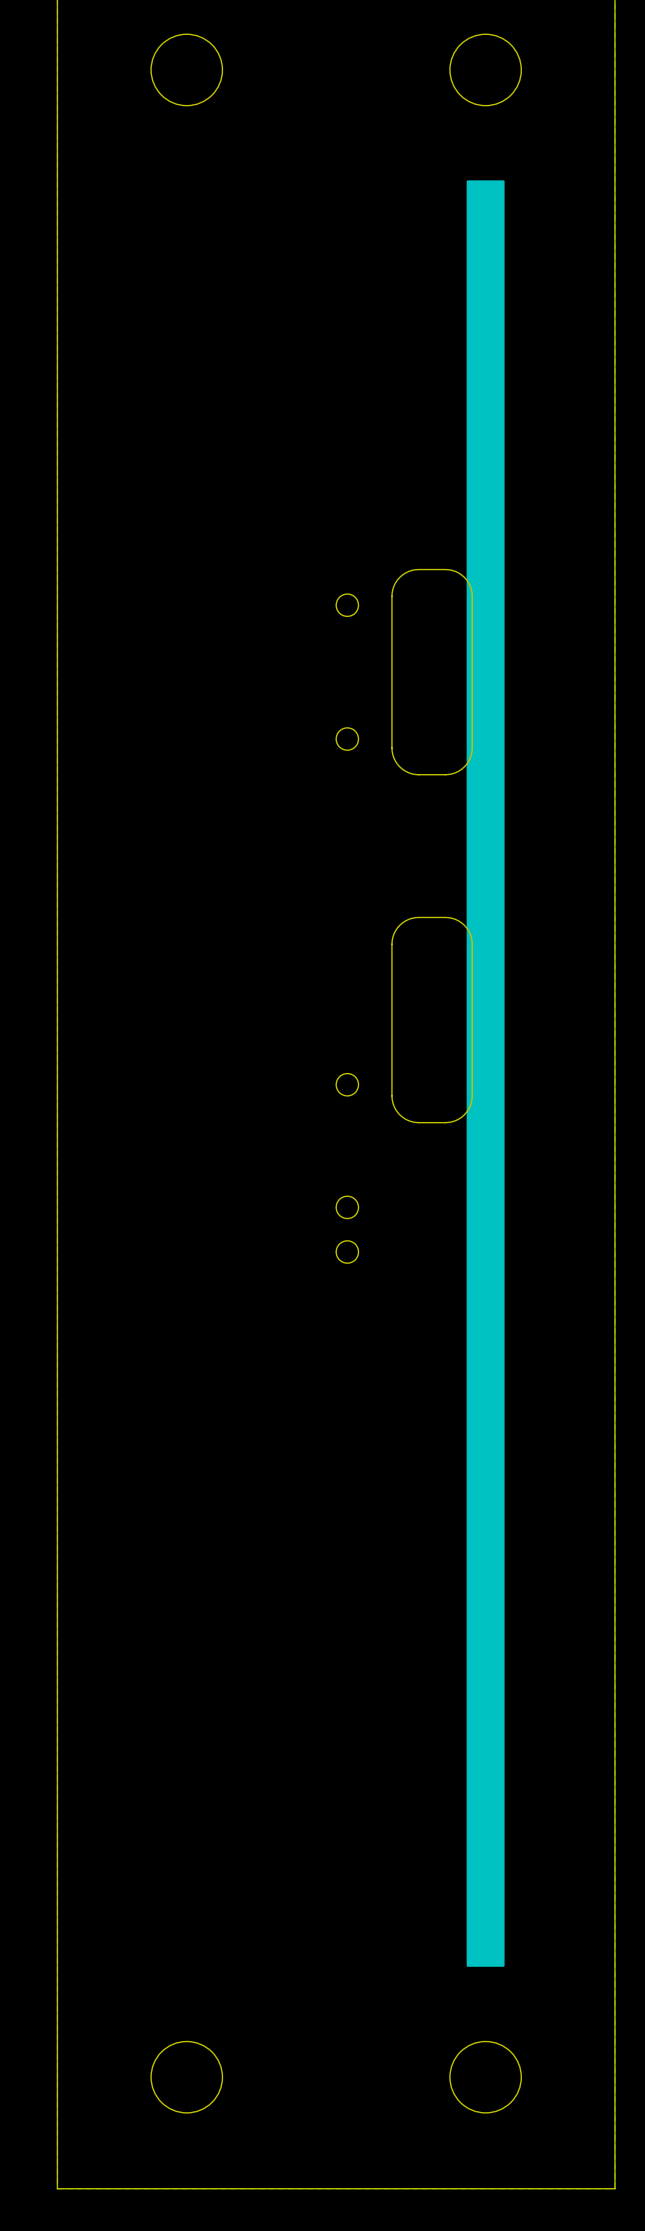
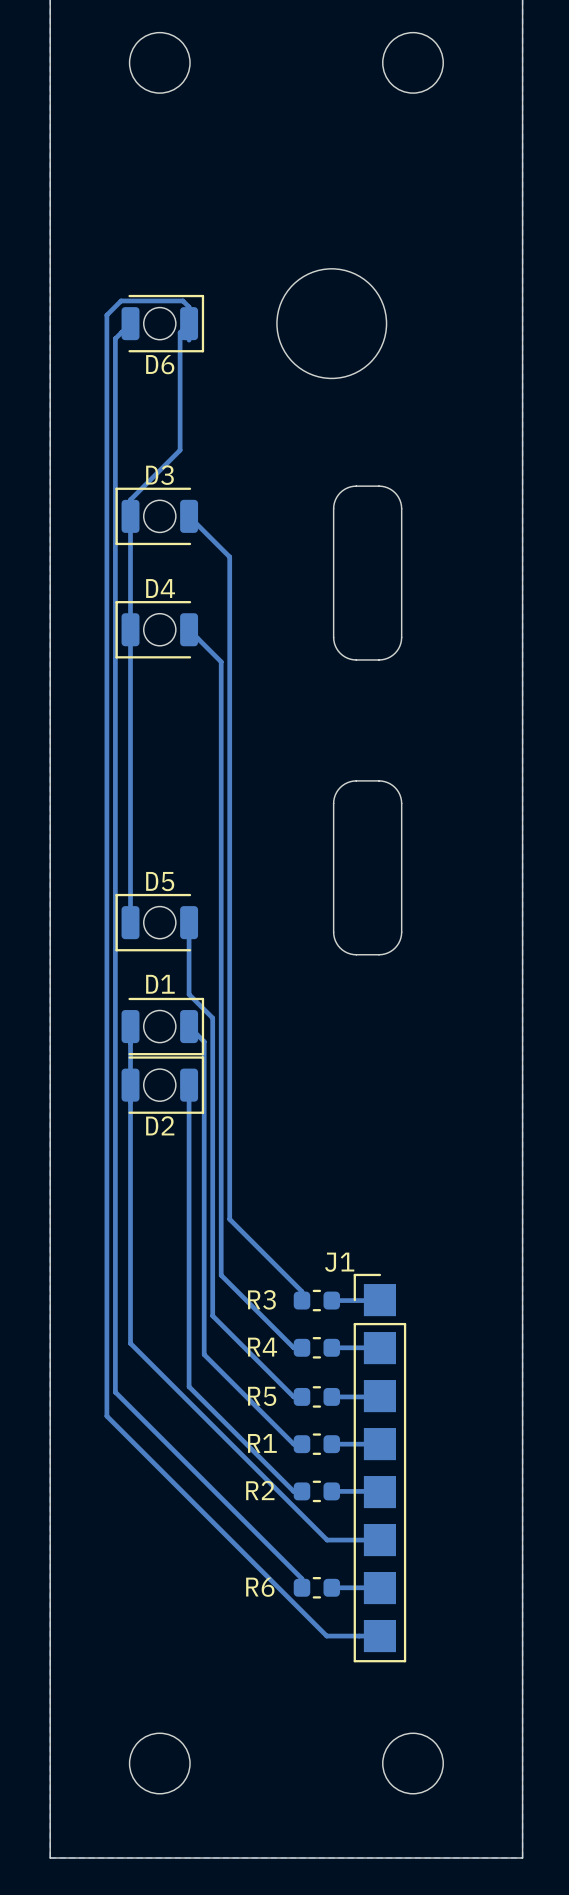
drawing: [466, 180, 505, 1967] -> none
round board edge: none -> [276, 268, 388, 379]
track: none -> (130, 323) (115, 338) (115, 1392) (301, 1578) (301, 1587)
D6: none -> (162, 323)
track: none -> (189, 323) (180, 332) (180, 450) (130, 499) (130, 922)
track: none -> (189, 340) (189, 307) (182, 300) (121, 300) (106, 315) (106, 1416) (326, 1636) (379, 1636)
round board edge: [335, 593, 360, 617] -> none
D3: none -> (156, 516)
track: none -> (189, 516) (229, 556) (229, 1219) (301, 1291) (301, 1300)
round board edge: [335, 727, 360, 751] -> none
D4: none -> (156, 629)
track: none -> (189, 629) (221, 661) (221, 1275) (293, 1347) (301, 1347)
round board edge: [335, 1073, 360, 1097] -> none
D5: none -> (156, 922)
track: none -> (189, 922) (189, 994) (212, 1018) (212, 1315) (293, 1396) (301, 1396)
round board edge: [335, 1195, 360, 1220] -> none
track: none -> (130, 1026) (130, 1343) (327, 1540) (379, 1540)
D1: none -> (162, 1026)
track: none -> (189, 1026) (204, 1041) (204, 1354) (293, 1444) (301, 1444)
round board edge: [335, 1240, 360, 1264] -> none
D2: none -> (162, 1085)
track: none -> (189, 1085) (189, 1386) (293, 1491) (301, 1491)
R3: none -> (316, 1300)
track: none -> (379, 1300) (331, 1300)
R4: none -> (316, 1347)
track: none -> (331, 1347) (379, 1348)
track: none -> (379, 1396) (331, 1396)
R5: none -> (316, 1396)
R1: none -> (316, 1444)
track: none -> (379, 1444) (331, 1444)
J1: none -> (379, 1468)
R2: none -> (316, 1491)
track: none -> (331, 1491) (379, 1492)
R6: none -> (316, 1587)
track: none -> (331, 1587) (379, 1588)

